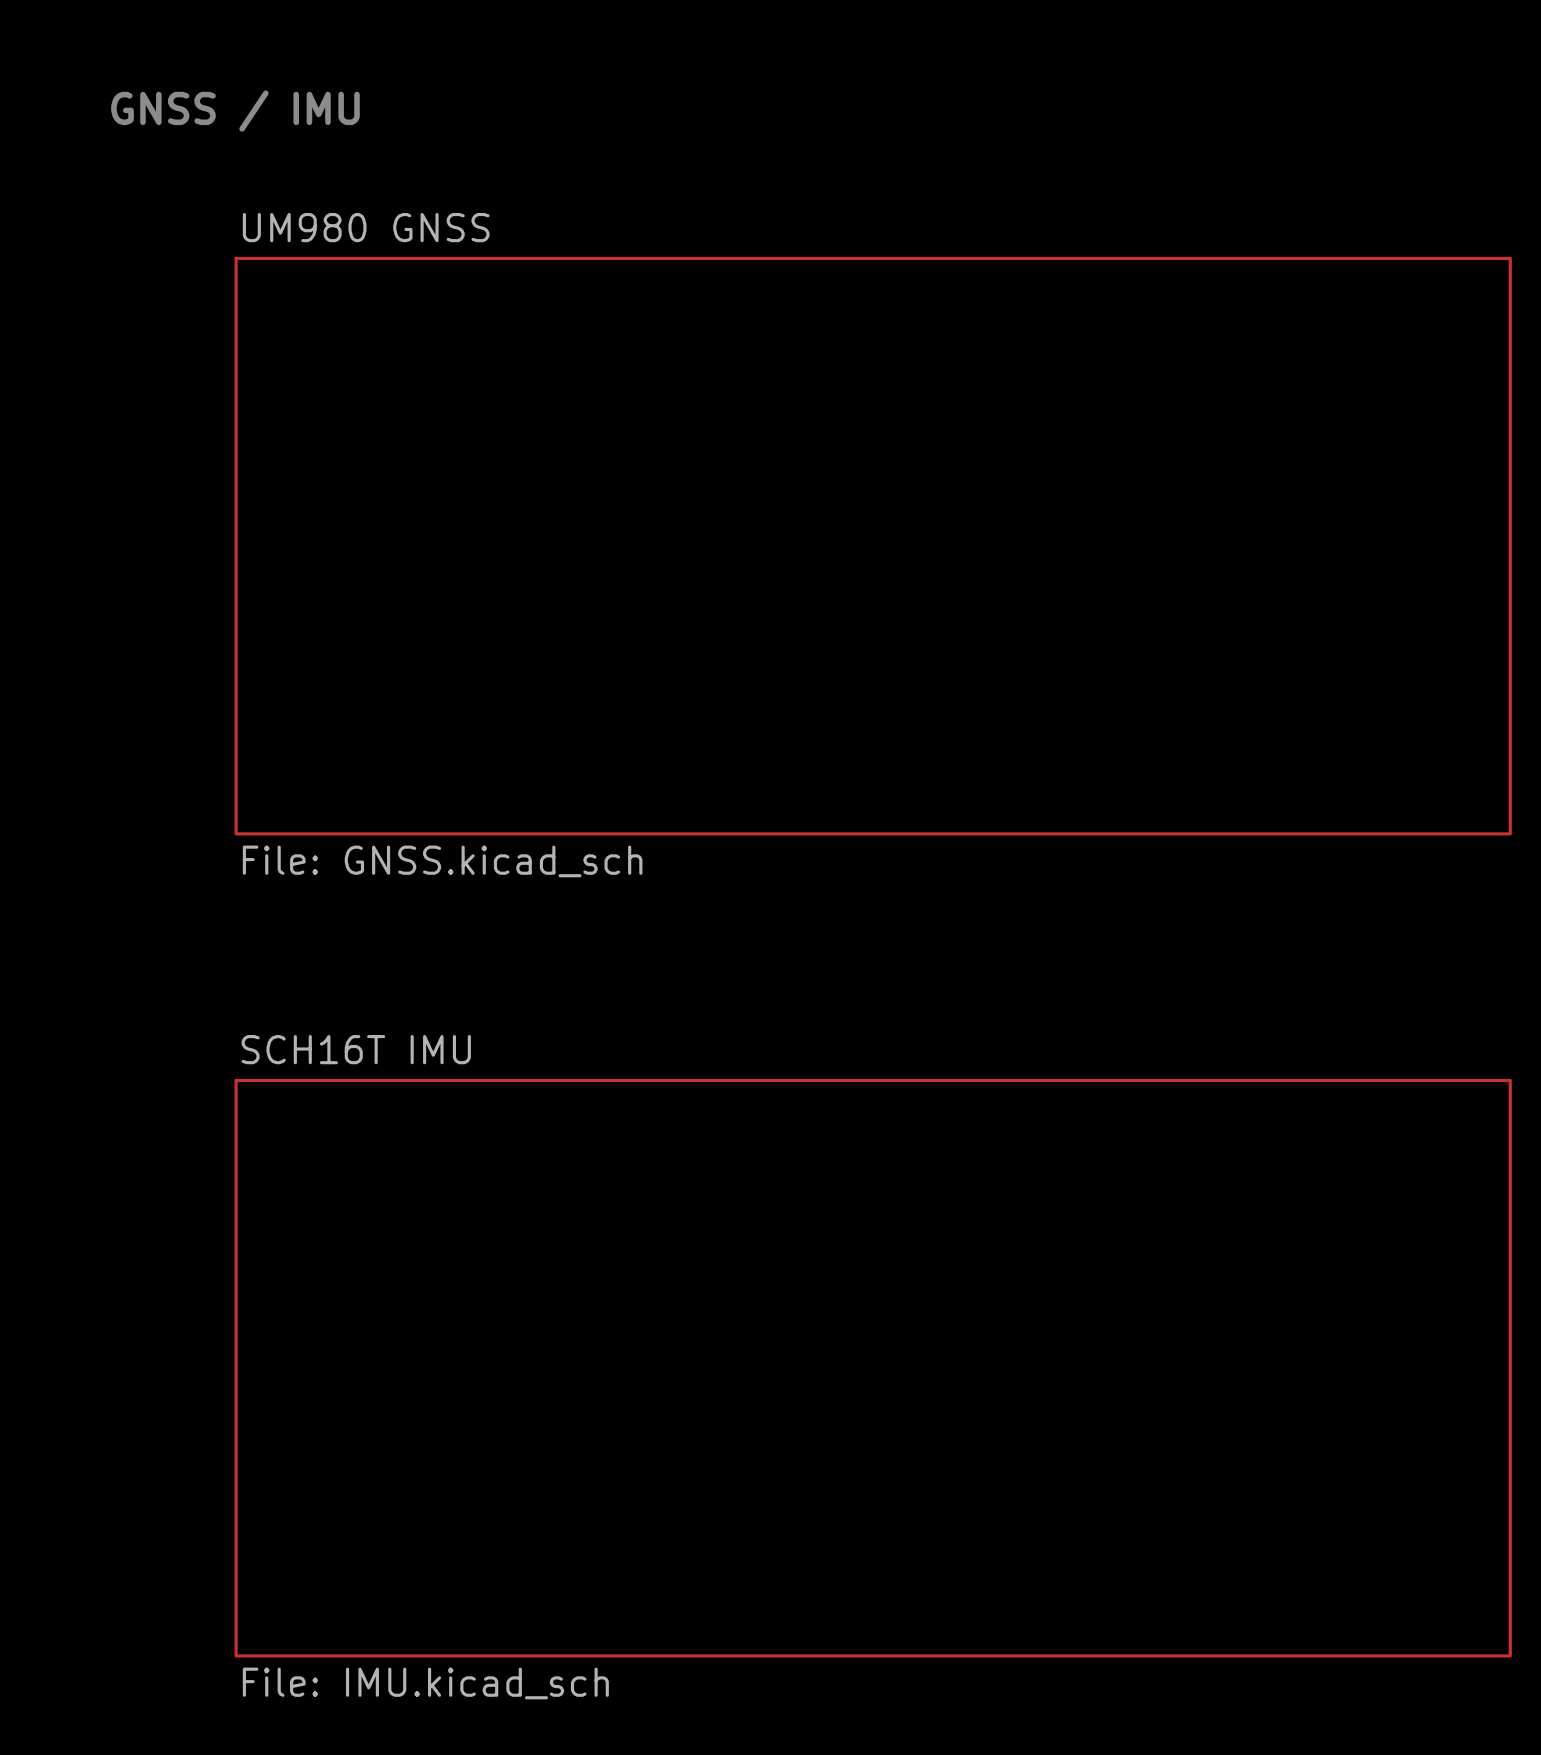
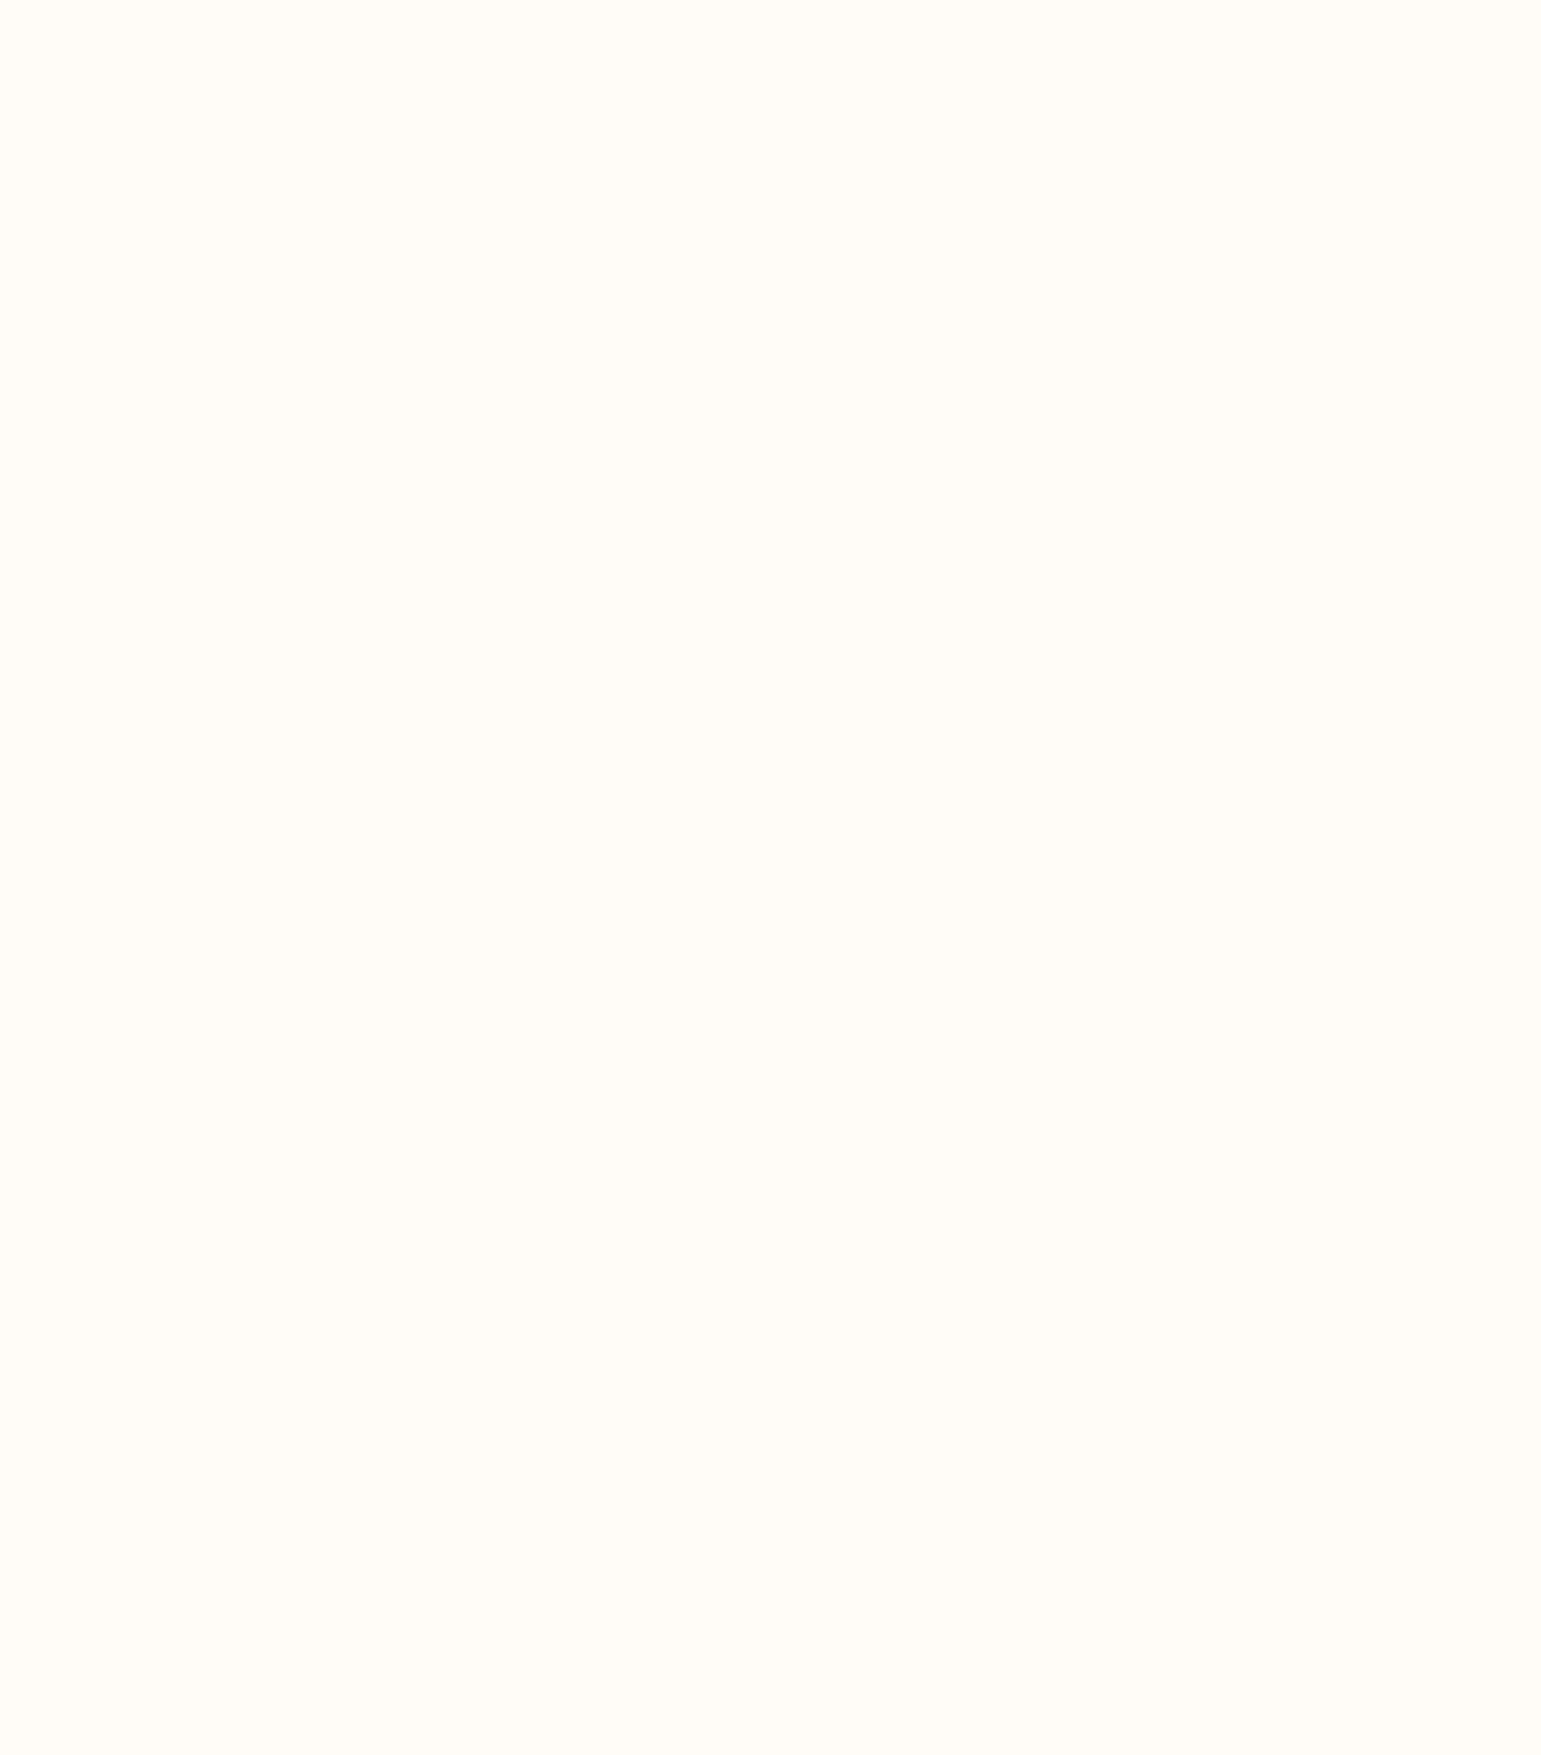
text: GNSS / IMU (235, 111) -> none
sheet UM980 GNSS: File: GNSS.kicad_sch (873, 546) -> none
sheet SCH16T IMU: File: IMU.kicad_sch (873, 1368) -> none

